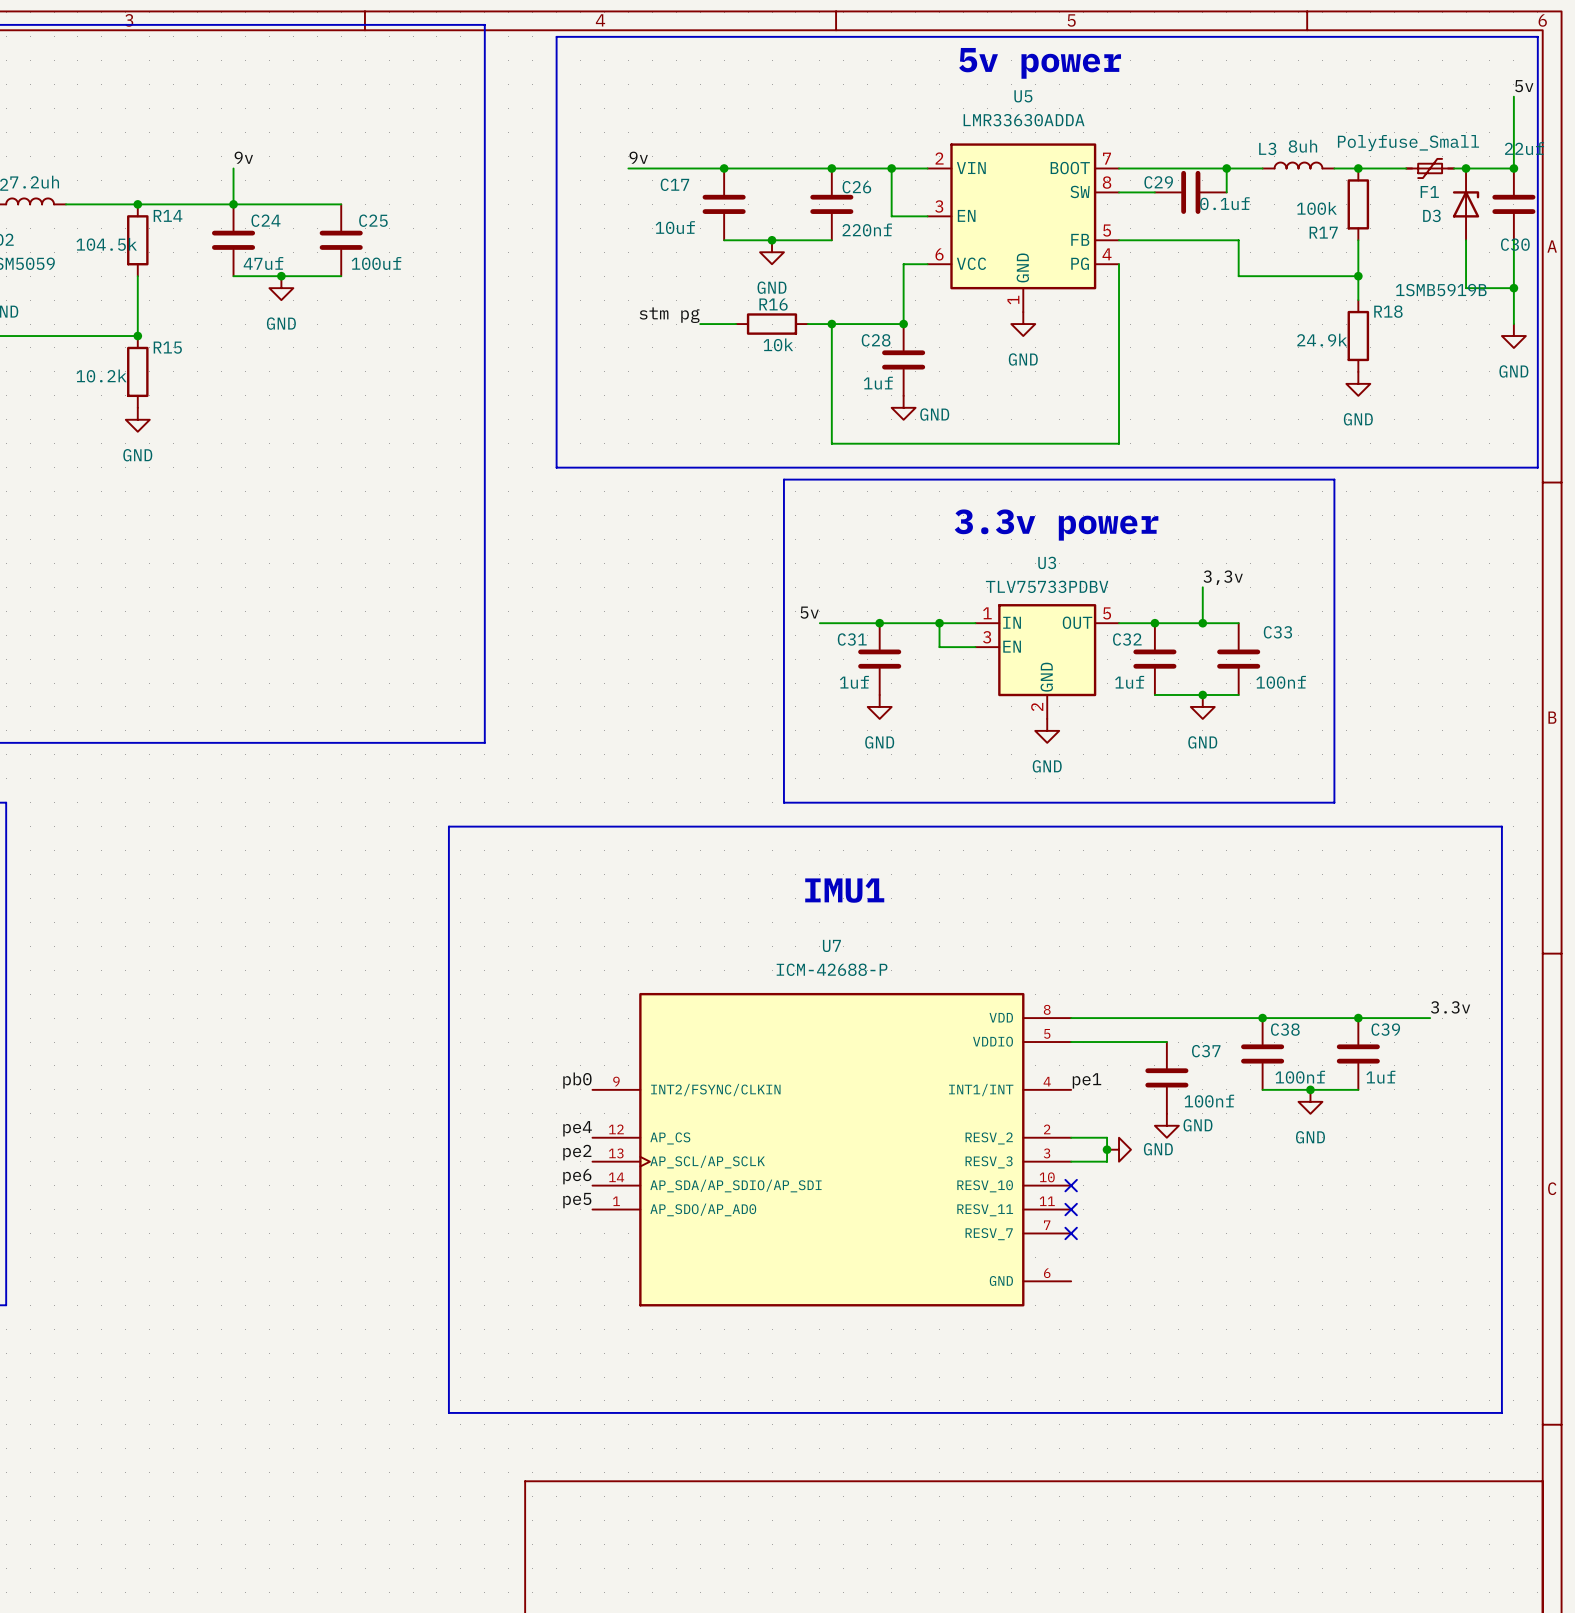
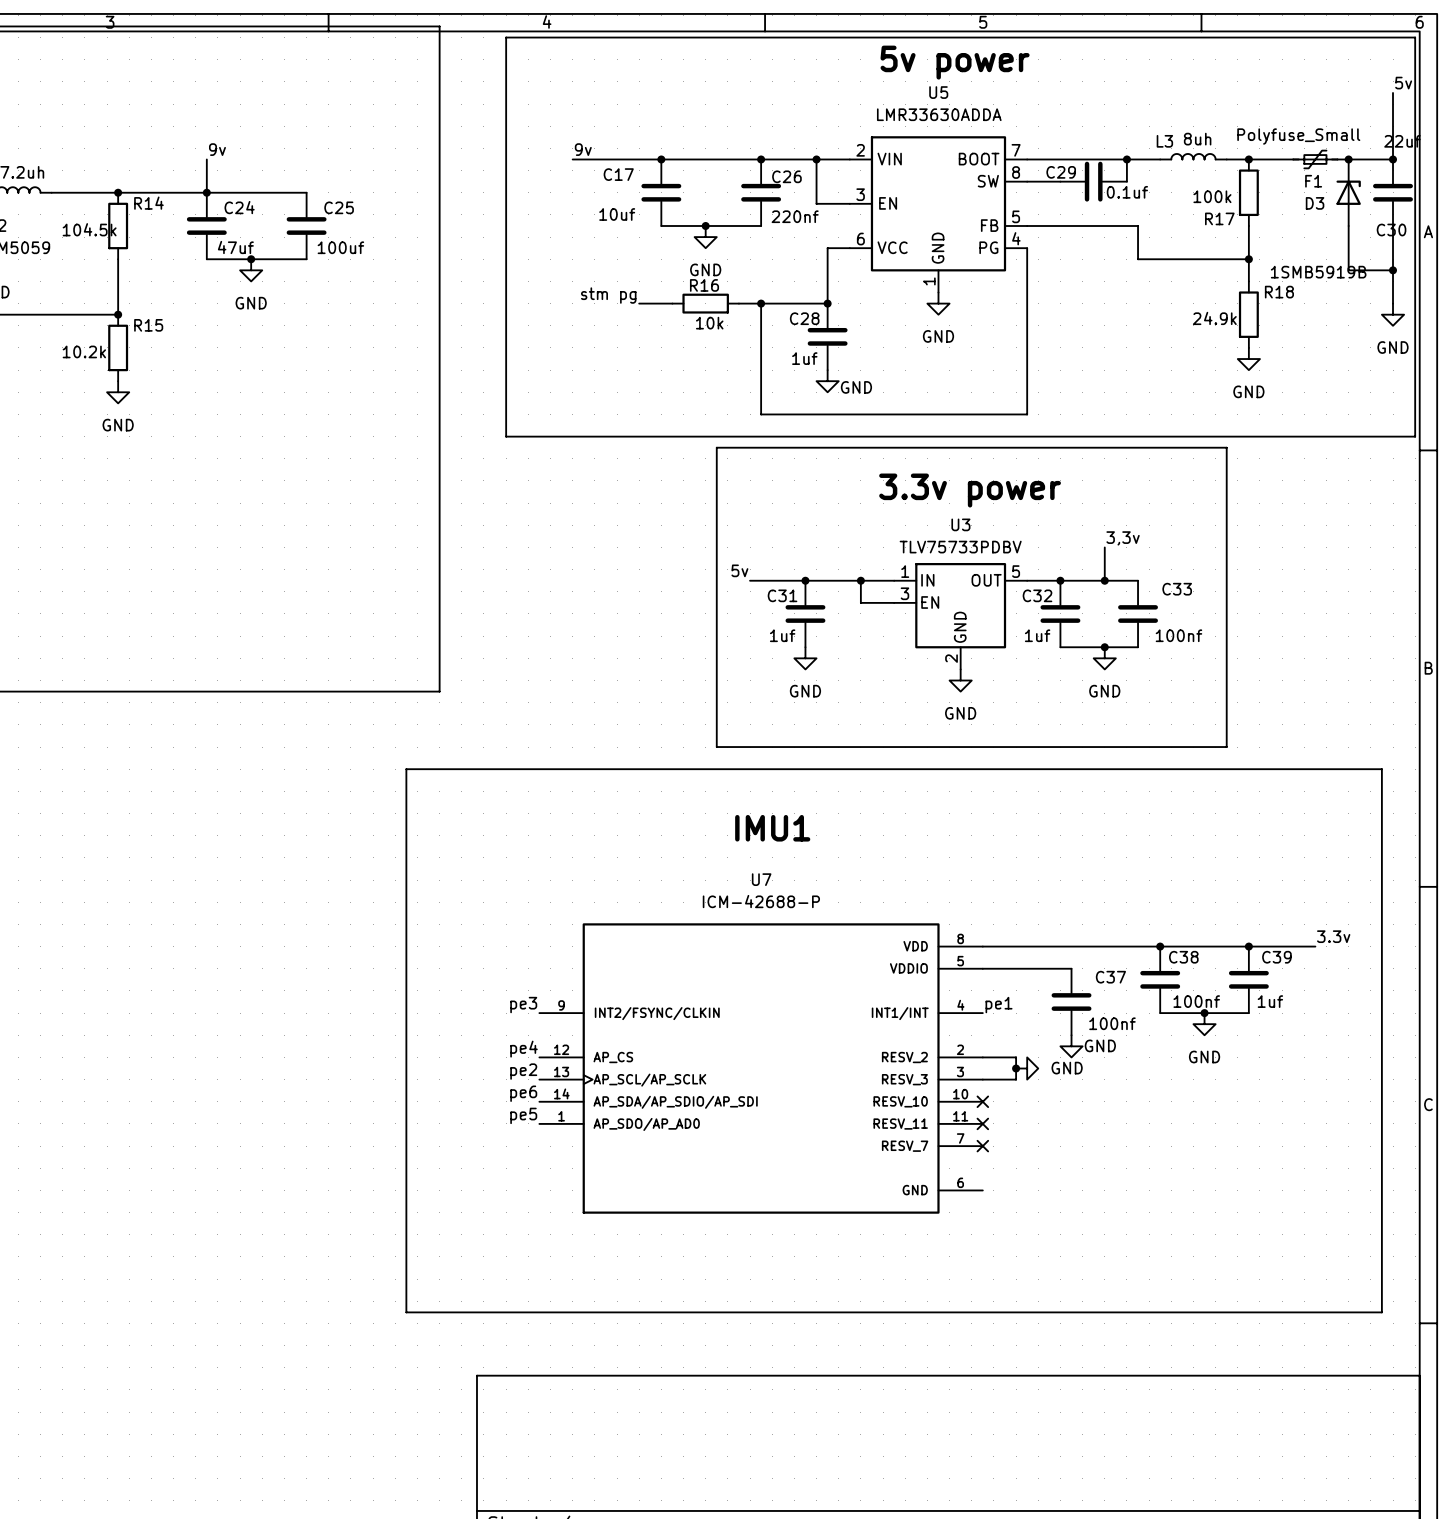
label: pb0 (577, 1080) -> pe3 (523, 1005)

